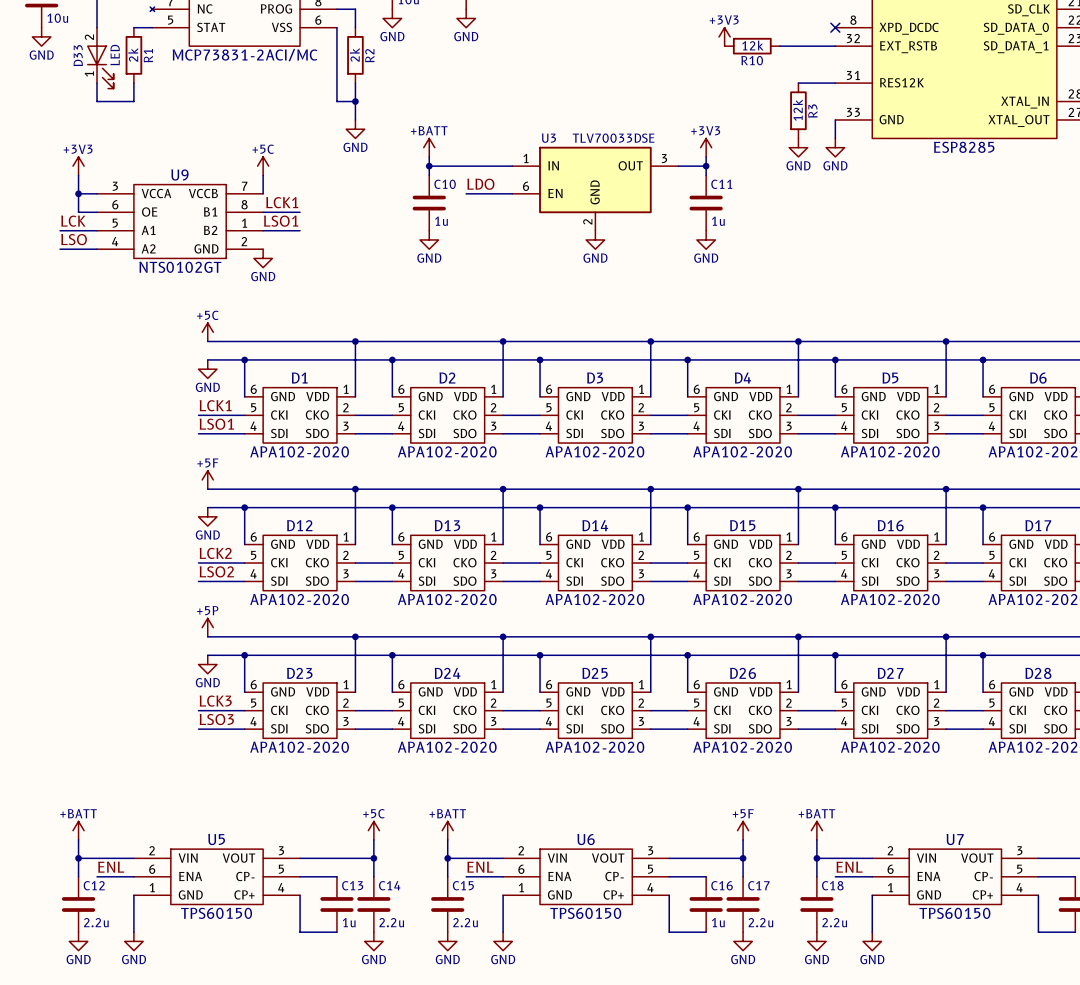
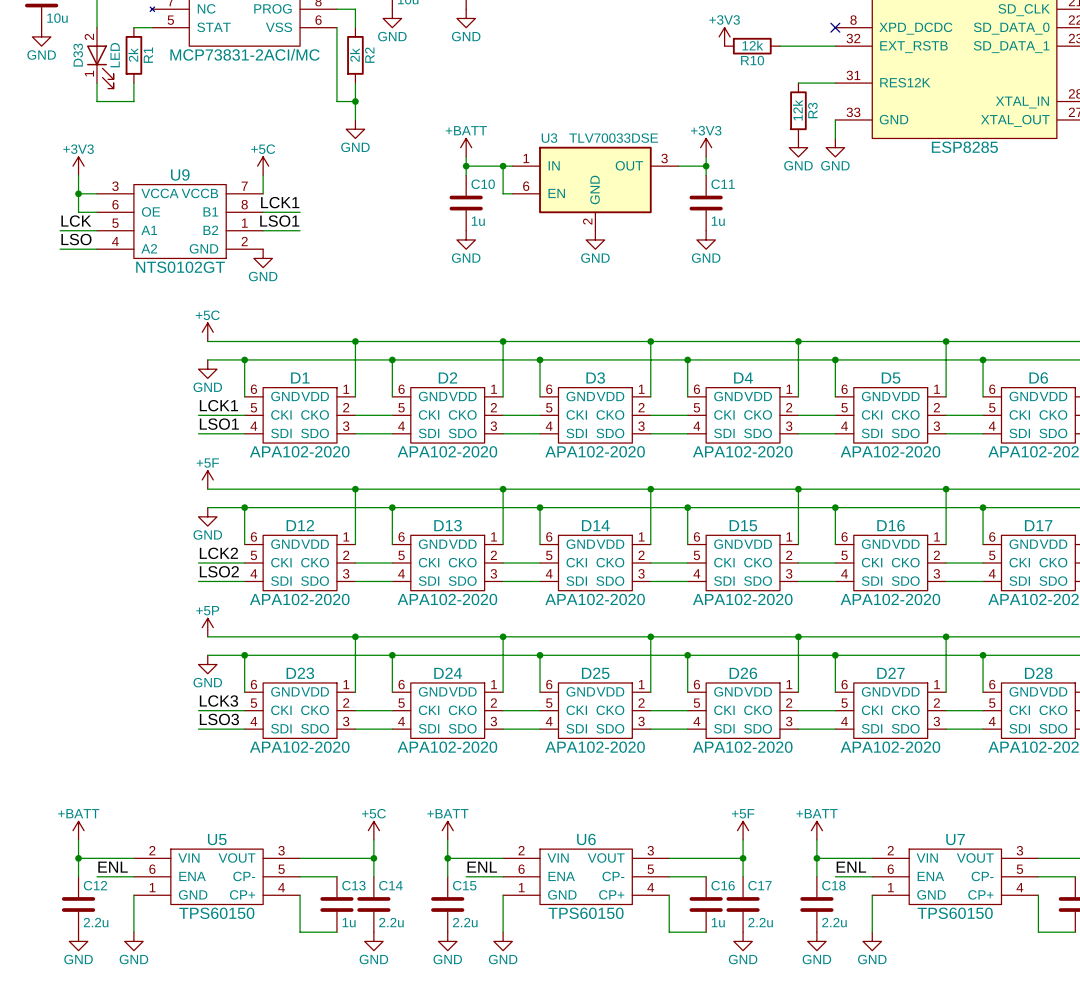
power symbol position: +BATT (429, 147) -> +BATT (466, 147)
wire: (429, 156) (429, 175) -> (466, 156) (466, 175)
wire: (429, 166) (466, 166) -> none
junction: (429, 166) -> none
junction: none -> (466, 166)
junction: none -> (503, 166)
label: LDO (480, 184) -> none
wire: (466, 193) (503, 193) -> (503, 166) (503, 193)
C10 position: (429, 203) -> (466, 203)
power symbol position: GND (429, 239) -> GND (466, 239)

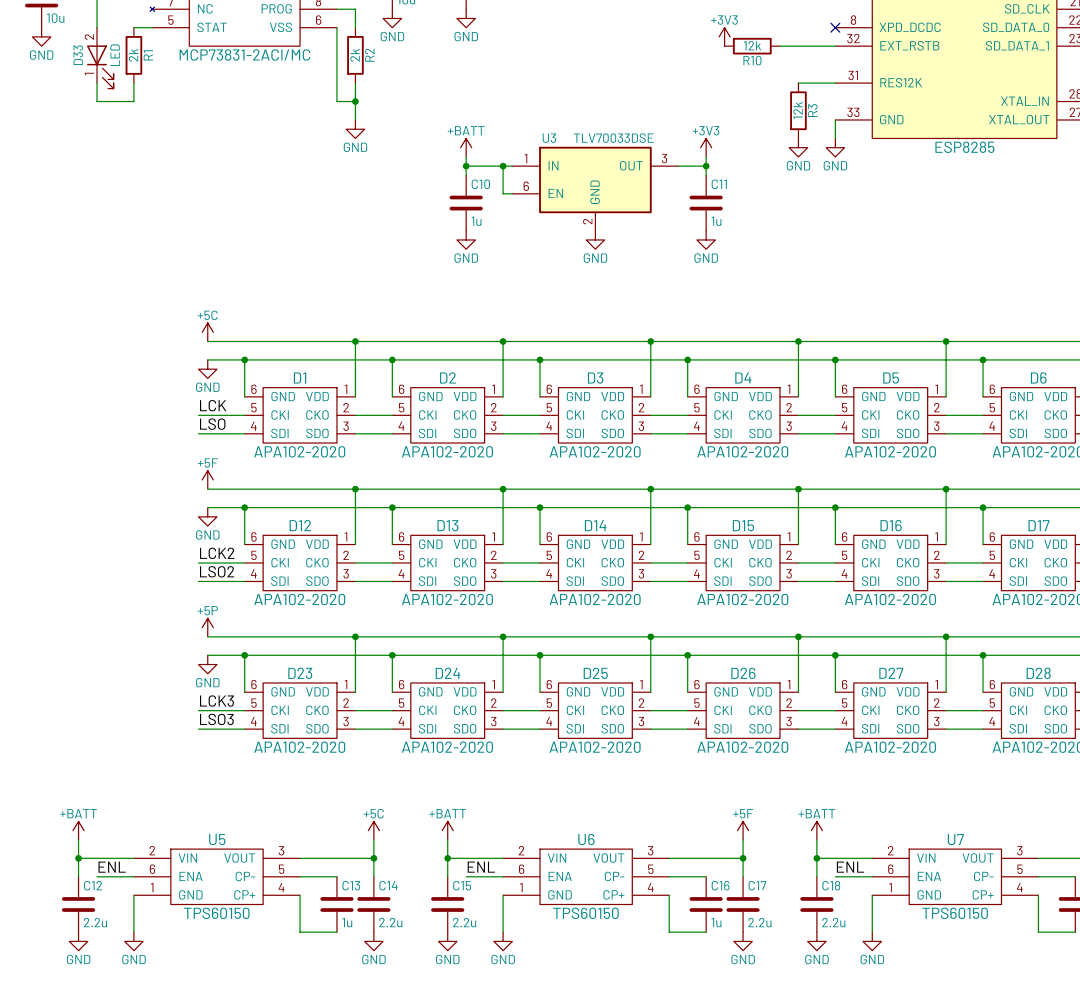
power symbol: +3V3 (78, 166) -> none
power symbol: +5C (263, 166) -> none
wire: (78, 175) (78, 212) (97, 212) -> none
wire: (263, 175) (263, 193) -> none
wire: (78, 193) (97, 193) -> none
junction: (78, 193) -> none
label: LCK1 (280, 202) -> none
wire: (263, 212) (300, 212) -> none
label: LCK (76, 221) -> none
U9: NTS0102GT (180, 221) -> none
label: LSO1 (279, 221) -> none
wire: (60, 230) (97, 230) -> none
wire: (263, 230) (300, 230) -> none
label: LSO (76, 239) -> none
wire: (60, 249) (97, 249) -> none
power symbol: GND (263, 258) -> none
label: LCK1 (218, 405) -> LCK (213, 405)
label: LSO1 (219, 424) -> LSO (212, 424)

